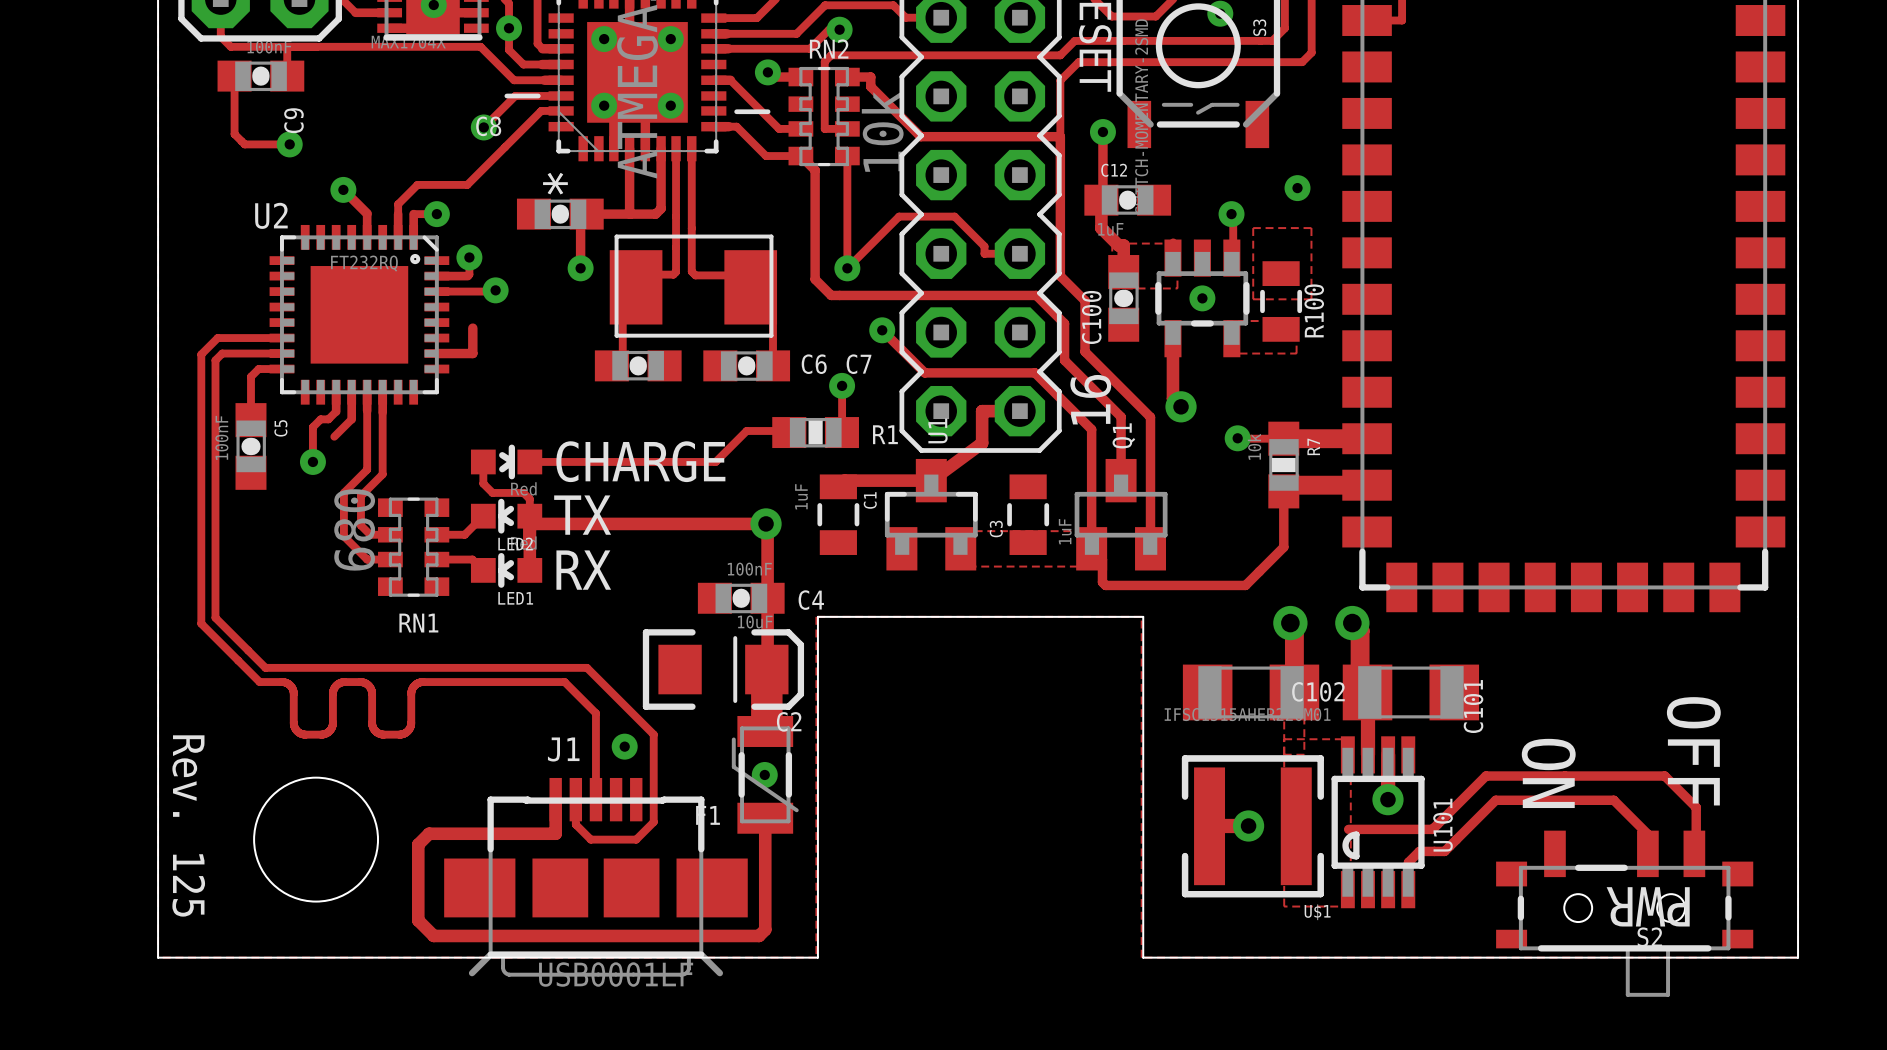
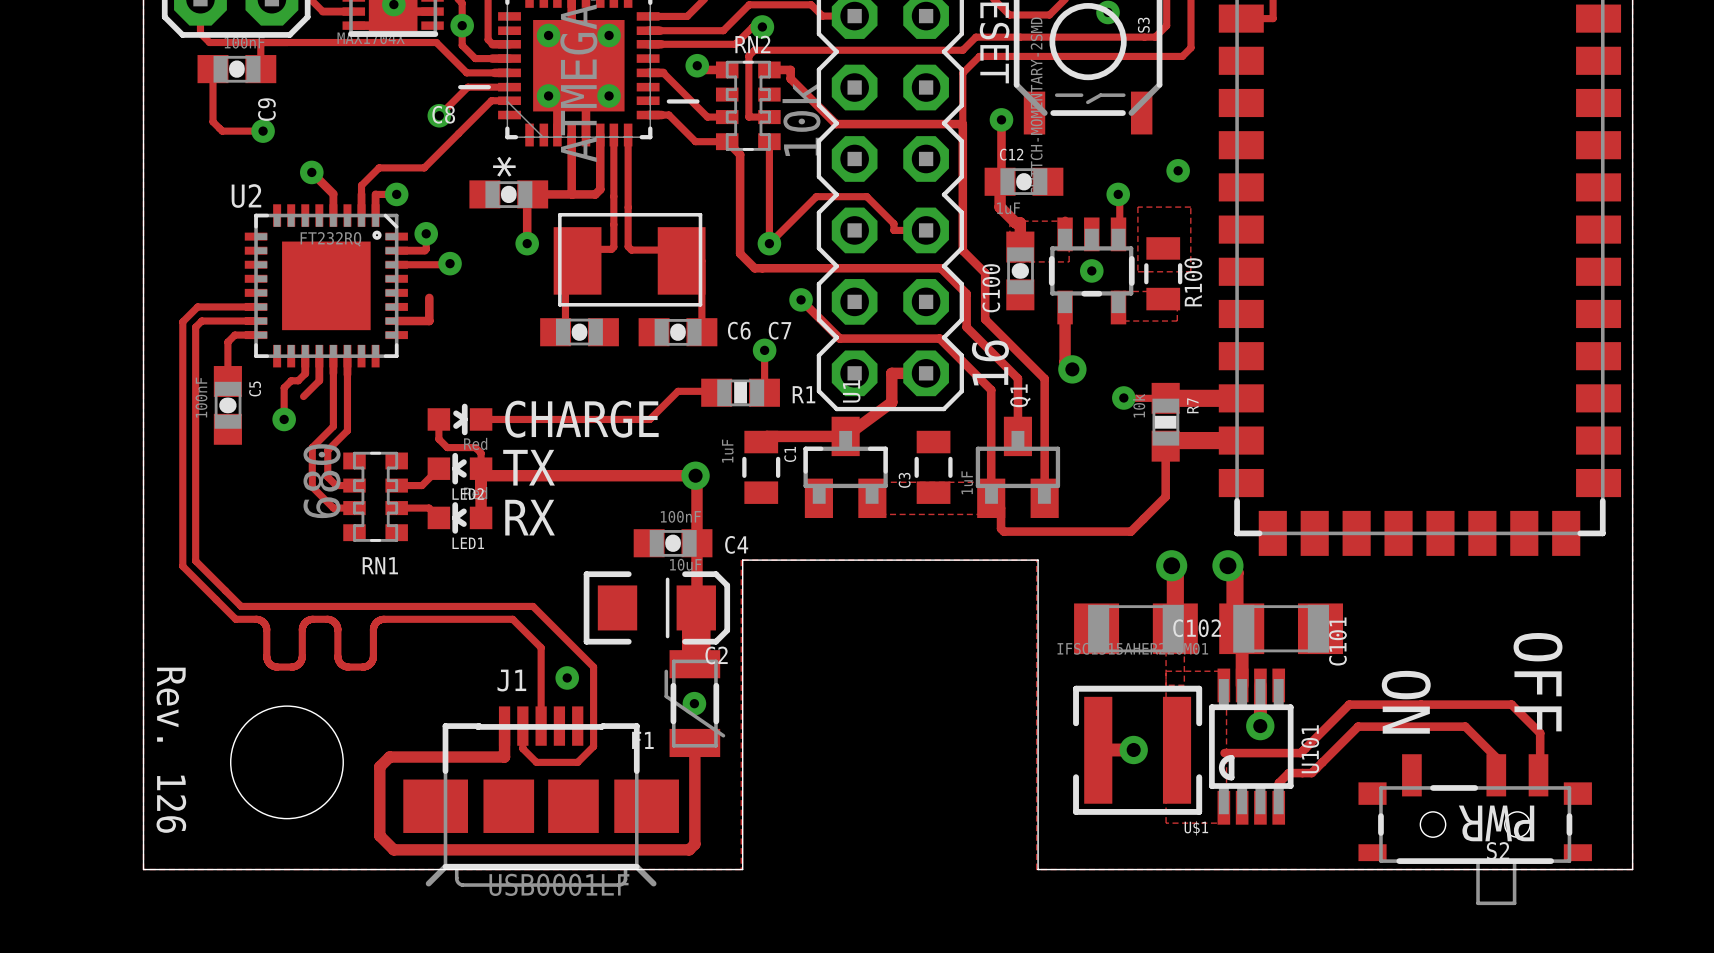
text: Rev. 125 (188, 825) -> Rev. 126 (171, 750)

